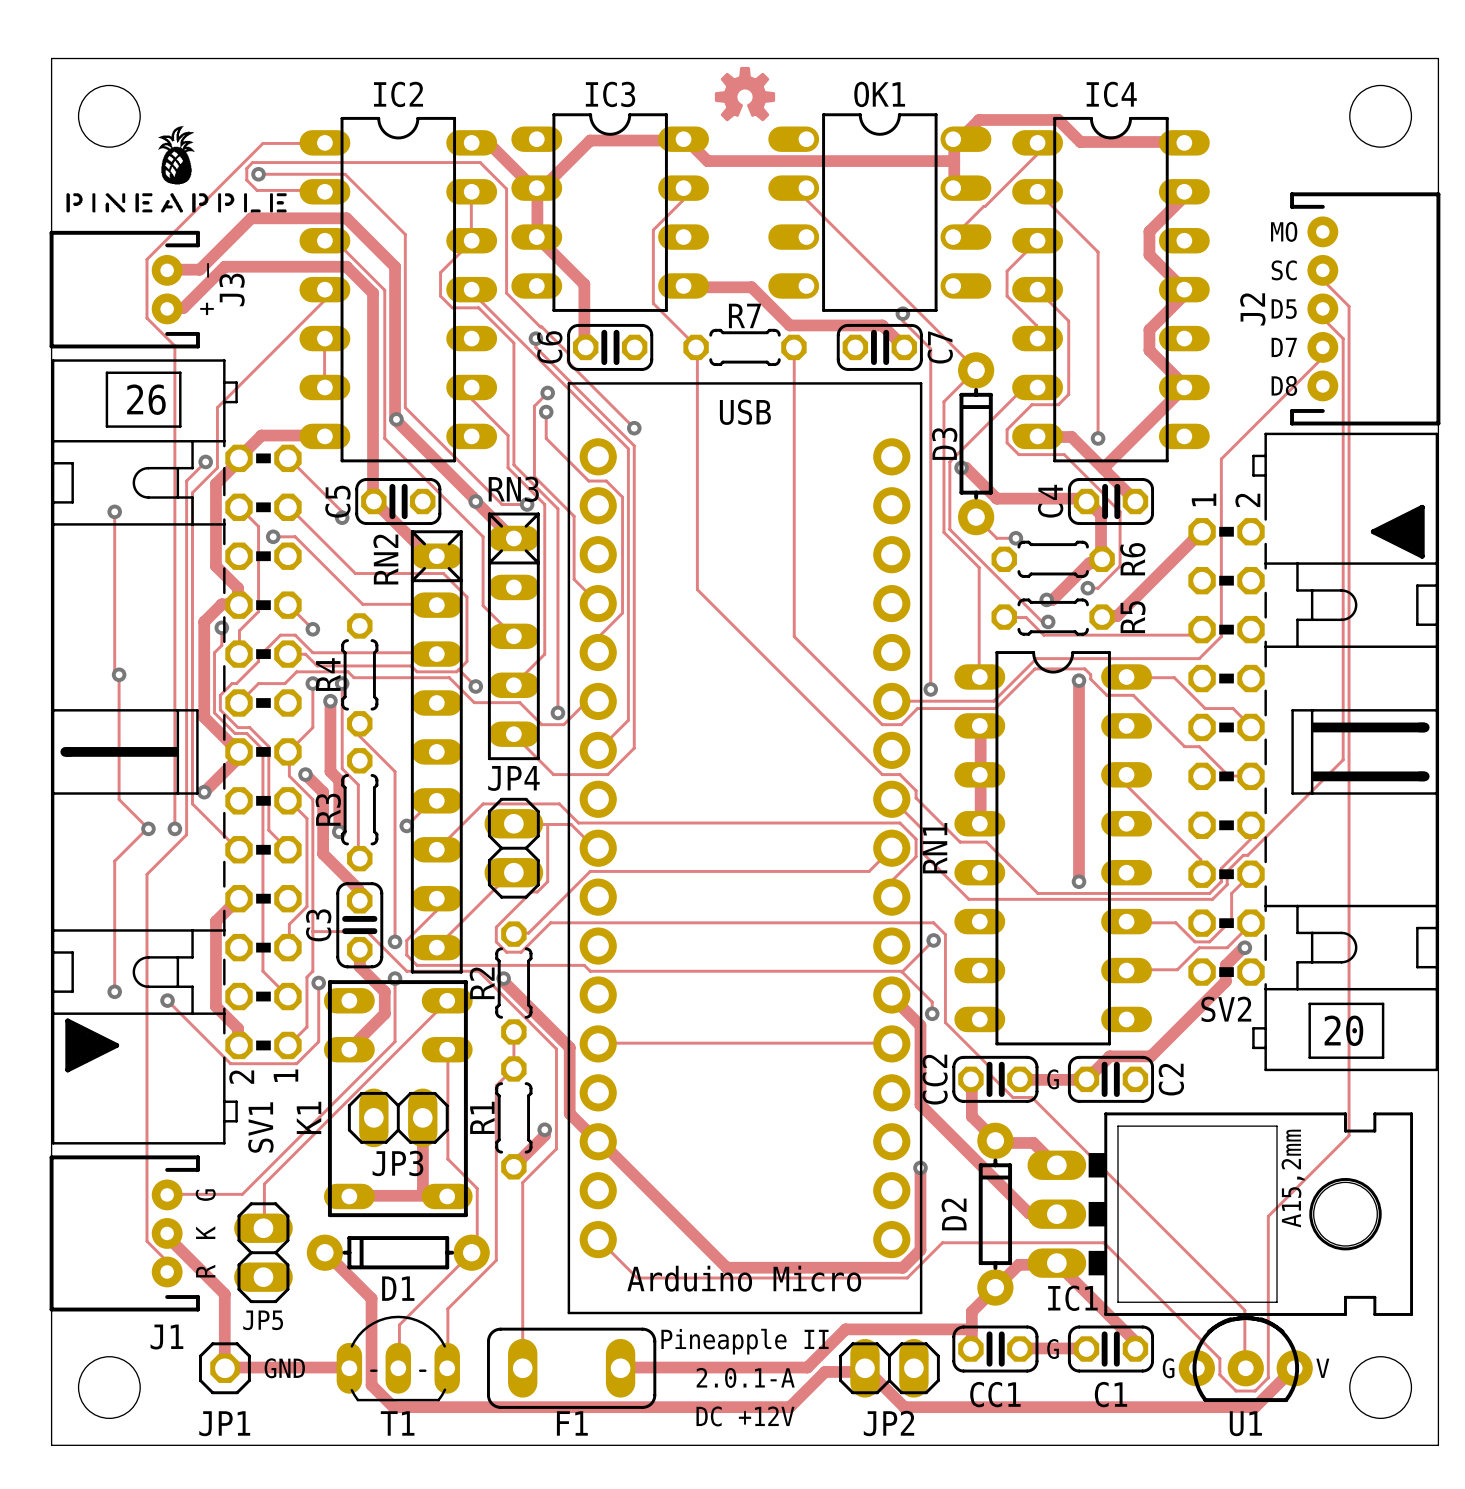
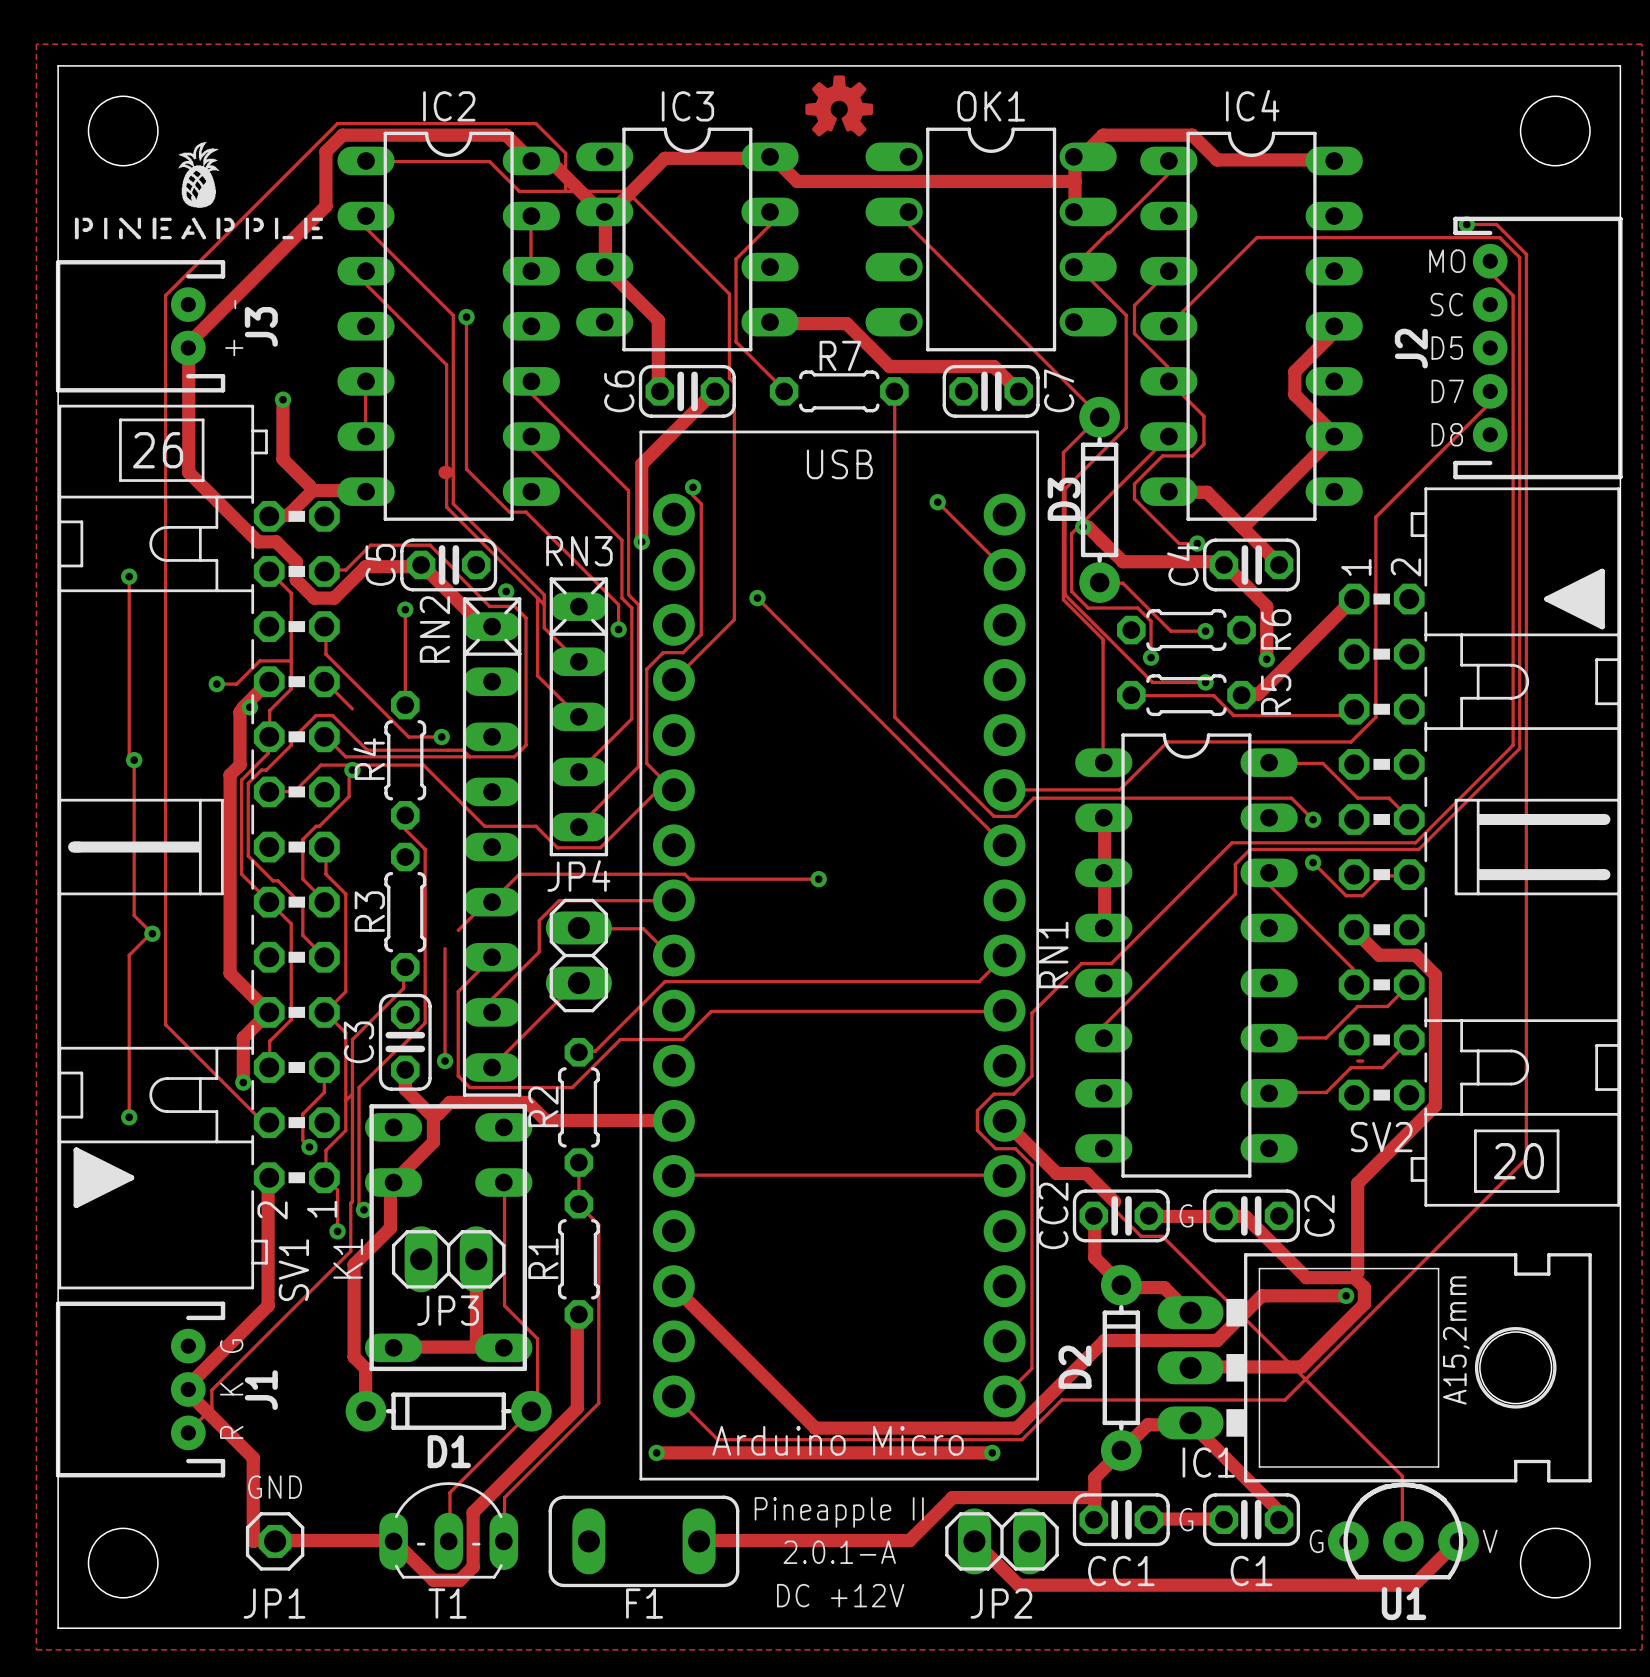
zone outline: none -> (36, 44) (1642, 44) (1642, 1649) (36, 1649) (36, 44)
track: (324, 142) (262, 143) (146, 259) (146, 262) -> (565, 191) (565, 153) (535, 123) (337, 123) (165, 295)
track: (258, 174) (345, 174) (405, 234) (405, 407) (414, 416) -> (466, 317) (466, 469)
via: (258, 174) -> none
track: (324, 191) (257, 190) (246, 180) (246, 168) (252, 162) (480, 162) (506, 188) (506, 293) (568, 353) (568, 362) (634, 428) -> (366, 216) (367, 229) (453, 315) (453, 503) (544, 594) (544, 604)
track: (1037, 191) (1098, 252) (1098, 438) -> none
track: (1184, 191) (1183, 197) (1149, 231) (1149, 255) (1184, 289) -> none
track: none -> (1466, 224) (1496, 224) (1526, 254) (1526, 1158) (1284, 1400) (1243, 1400)
via: none -> (1466, 224)
track: none -> (1073, 267) (1076, 265) (1126, 315) (1126, 427) (1065, 488) (1065, 594) (1152, 682) (1205, 682)
track: (471, 240) (440, 272) (440, 296) (452, 307) (478, 307) (513, 343) (513, 464) (557, 508) -> (531, 381) (532, 394) (628, 490) (628, 573)
track: (326, 241) (336, 241) (384, 290) (384, 438) (396, 450) -> (367, 272) (367, 285) (446, 364) (446, 507)
track: (167, 270) (199, 269) (251, 218) (346, 218) (395, 266) (395, 419) (513, 538) -> none
track: (1322, 270) (1324, 281) (1349, 306) -> (1168, 326) (1256, 237) (1499, 237) (1519, 257) (1519, 345)
via: none -> (466, 317)
track: (324, 289) (324, 300) (217, 407) (217, 467) (192, 492) (192, 803) (239, 849) -> none
track: (471, 289) (472, 293) (628, 448) (628, 720) (598, 750) -> none
track: (1037, 289) (1068, 321) (1068, 369) -> (1169, 381) (1203, 416)
track: (167, 308) (183, 307) (224, 266) (346, 266) (373, 293) (373, 501) -> (531, 160) (506, 135) (342, 135) (325, 151) (325, 206) (190, 341) (188, 347) (188, 472) (258, 541) (276, 541) (296, 561) (296, 579) (314, 598) (334, 598) (365, 566) (415, 566) (421, 564)
track: (1322, 308) (1324, 319) (1343, 338) -> (1490, 261) (1491, 274) (1513, 295) (1513, 381)
track: (902, 313) (902, 321) (930, 348) (930, 689) -> none
via: (902, 313) -> none
track: (146, 318) (174, 346) (174, 828) -> (165, 358) (165, 985)
track: (535, 338) (535, 347) (634, 445) (634, 748) (607, 774) (553, 774) (513, 734) -> none
via: (535, 338) -> none
track: none -> (714, 391) (641, 464) (641, 541)
track: (696, 347) (697, 589) (882, 774) (899, 774) (916, 790) (916, 798) (960, 842) (986, 842) (1037, 893) (1205, 893) -> none
via: none -> (282, 399)
track: (1036, 388) (1023, 388) (949, 461) (949, 529) (1042, 621) (1048, 621) -> (1167, 437) (1071, 533) (1071, 591) (1088, 608) (1137, 608) (1151, 621) (1151, 657)
track: (547, 392) (534, 406) (534, 476) (574, 516) (574, 579) (598, 603) -> (366, 160) (489, 161) (519, 191) (626, 191) (729, 293) (729, 378) (734, 383) (734, 619) (673, 679)
via: (547, 392) -> none
track: (546, 412) (546, 438) (588, 481) (606, 481) (622, 497) -> (693, 487) (693, 495) (701, 503) (701, 560)
via: (546, 412) -> none
via: (396, 419) -> none
via position: (634, 428) -> (693, 487)
track: (277, 435) (261, 435) (239, 457) -> (282, 399) (282, 459) (312, 490) (287, 515) (269, 515)
track: (508, 435) (508, 467) (544, 504) (544, 654) -> (572, 490) (621, 540) (621, 598) (631, 608) (631, 718) (613, 736)
via: (1098, 438) -> none
track: none -> (937, 502) (1004, 569)
via: none -> (937, 502)
track: (452, 454) (502, 504) (527, 504) -> (509, 512) (526, 512) (618, 604) (618, 629)
track: (1018, 454) (1064, 454) (1120, 511) (1120, 566) (1098, 588) (1087, 588) -> (1147, 512) (1179, 543) (1197, 543)
track: (239, 458) (236, 463) (215, 483) (215, 566) (237, 588) (239, 605) (221, 604) (204, 621) (204, 687) -> (269, 681) (239, 712) (239, 765) (230, 775)
track: (287, 458) (342, 511) (342, 517) -> none
track: (205, 461) (186, 481) (186, 834) (146, 874) -> none
via: (205, 461) -> none
via: none -> (641, 541)
via: none -> (1197, 543)
via position: (475, 501) -> (506, 591)
via: (527, 504) -> none
track: (287, 507) (355, 573) (443, 573) (466, 596) -> (324, 571) (345, 570) (370, 545) (430, 545) (489, 606) (514, 606) (526, 617) (526, 672)
track: (1101, 514) (1102, 559) (1096, 563) (1089, 563) (1052, 599) (1046, 599) -> (1240, 579) (1266, 606) (1266, 659)
via position: (342, 517) -> (405, 609)
track: (976, 517) (996, 538) (1015, 538) -> (1099, 583) (1122, 583) (1170, 631) (1205, 631)
track: (557, 528) (557, 712) -> (628, 594) (638, 604) (638, 766) (578, 827)
track: none -> (757, 598) (1004, 845)
via: none -> (757, 598)
track: (273, 536) (295, 536) (362, 604) (436, 605) -> none
via: (273, 536) -> none
via: (1015, 538) -> none
track: none -> (405, 609) (405, 705)
track: none -> (324, 626) (325, 627) (325, 654) (408, 736) (441, 736)
track: (483, 557) (483, 605) -> (537, 598) (537, 675) (544, 682)
track: none -> (544, 627) (578, 661)
via: none -> (618, 629)
via: none -> (1205, 631)
track: (622, 563) (622, 613) (599, 636) (598, 652) -> none
via: none -> (1151, 657)
via: none -> (1266, 659)
track: none -> (291, 660) (259, 660) (236, 684) (216, 684)
via: (1087, 588) -> none
via: (1046, 599) -> none
via: none -> (1205, 682)
via: none -> (216, 684)
track: (1026, 617) (1043, 635) (1095, 635) -> (1155, 695) (1213, 695) (1233, 715)
via: (1048, 621) -> none
track: (221, 627) (221, 645) (214, 652) (214, 692) -> (269, 736) (268, 753) (241, 779)
via: (312, 629) -> none
track: (312, 652) (436, 654) -> (352, 735) (367, 750)
track: (289, 654) (305, 654) (317, 665) (326, 665) -> (325, 736) (345, 756)
via: none -> (441, 736)
track: (1343, 661) (1343, 759) (1247, 855) (1243, 855) (1227, 871) (1227, 884) (1212, 899) (968, 899) (921, 852) (921, 828) (891, 799) -> (1513, 745) (1415, 842) (1232, 842) (1111, 963) (1081, 963) (1031, 1013) (1031, 1075) (1013, 1094)
track: (1349, 664) (1349, 1135) (1268, 1216) (1268, 1377) (1255, 1391) (1236, 1391) (1219, 1374) (1219, 1358) (1103, 1242) -> (1519, 748) (1418, 849) (1250, 849) (1235, 864) (1235, 894) (1104, 1024) (1103, 1038)
track: (458, 669) (475, 686) -> none
track: (306, 671) (296, 671) (284, 683) (258, 683) (239, 702) -> (701, 634) (683, 652) (663, 652) (646, 669) (646, 763) (673, 790) (664, 783) (600, 847) (557, 847) (535, 826) (484, 826) (423, 765) (321, 765) (294, 791) (269, 791)
track: (348, 671) (353, 677) (449, 677) (474, 702) (519, 702) (541, 724) (563, 724) (585, 702) (598, 701) -> (392, 756) (469, 756)
track: (1078, 680) (1078, 881) -> none
via: (1078, 680) -> none
track: (312, 683) (312, 727) (287, 751) -> none
track: (342, 683) (342, 768) (358, 784) (359, 858) -> none
via: (342, 683) -> none
via: (475, 686) -> none
via: (930, 689) -> none
track: none -> (349, 778) (349, 796) (319, 826) (316, 826) (302, 841)
track: (330, 701) (330, 771) (339, 780) (339, 831) -> none
via: (330, 701) -> none
track: (995, 708) (1034, 668) (1084, 668) (1090, 674) (1090, 679) (1106, 695) (1133, 695) (1146, 708) -> (1121, 798) (1291, 798)
track: (220, 710) (237, 727) (249, 727) (268, 746) -> (248, 799) (248, 856) (273, 880) (278, 880) (302, 905)
track: (214, 712) (235, 733) (246, 733) (262, 749) (262, 971) (287, 996) -> (241, 803) (241, 874) (291, 923) (291, 1019) (269, 1041) (269, 1067)
via: (557, 712) -> none
track: (204, 717) (239, 751) (236, 759) (204, 792) -> (230, 808) (230, 973) (269, 1012)
track: (1165, 727) (1184, 746) (1199, 746) (1228, 776) (1251, 776) -> (1313, 862) (1346, 895) (1362, 895) (1382, 875) (1409, 874)
via: none -> (1313, 819)
track: (377, 754) (395, 771) (395, 842) -> (425, 849) (425, 1023) (398, 1049)
via: none -> (1313, 862)
track: (305, 774) (323, 792) (323, 853) (358, 889) (359, 900) -> none
via: (305, 774) -> none
track: (268, 780) (268, 803) -> (302, 879) (324, 902)
track: none -> (818, 879) (689, 879) (684, 874) (519, 874) (492, 902)
via: none -> (818, 879)
via: (204, 792) -> none
track: (306, 793) (312, 799) (312, 922) -> (405, 967) (403, 968) (403, 988) (352, 1039)
track: (119, 799) (148, 828) (114, 861) -> (134, 900) (134, 915) (152, 933) (129, 955) (129, 970)
track: none -> (673, 900) (559, 900) (539, 920) (539, 951) (492, 998) (492, 1012)
track: (287, 800) (306, 818) -> (345, 894) (345, 922)
track: (547, 824) (547, 881) (537, 891) (531, 891) (496, 927) (496, 941) (506, 952) (521, 952) -> (572, 1087) (587, 1072)
via: (406, 825) -> none
track: none -> (1354, 929) (1379, 955) (1415, 955) (1435, 975) (1435, 1105) (1357, 1183) (1357, 1272) (1354, 1277)
track: (1251, 825) (1250, 839) (1221, 868) (1221, 881) (1209, 893) -> none
via position: (148, 828) -> (152, 933)
via: (174, 828) -> none
via: (339, 831) -> none
track: (436, 849) (483, 803) (559, 803) (578, 823) (899, 823) (916, 839) (916, 856) (892, 880) (891, 897) -> none
track: (306, 880) (306, 906) (289, 924) (287, 947) -> (345, 991) (324, 1012) (345, 1032) (345, 1100)
via: (1078, 881) -> none
track: (1231, 893) (1231, 919) (1209, 941) -> (1387, 1006) (1362, 1006)
track: (436, 898) (436, 911) (406, 940) -> (492, 957) (458, 991) (458, 1059)
track: (146, 909) (146, 1241) (166, 1260) (167, 1271) -> (352, 1094) (350, 1251) (211, 1390) (211, 1408) (188, 1432)
track: none -> (165, 1024) (263, 1122) (269, 1122)
track: (1126, 921) (1175, 922) (1194, 941) (1205, 941) -> (1269, 1038) (1326, 1037) (1357, 1006)
track: (606, 922) (933, 922) (945, 934) (945, 1022) (964, 1041) -> (683, 1039) (711, 1011) (1004, 1010)
track: (312, 931) (352, 931) -> (359, 1107) (359, 1087) (397, 1049)
track: (353, 931) (367, 931) (406, 971) (478, 971) (556, 1049) (556, 1148) (522, 1182) (522, 1368) -> none
track: (933, 940) (902, 971) -> none
via: (933, 940) -> none
track: none -> (324, 1067) (324, 1092) (302, 1113) (302, 1140) (309, 1147)
track: (1244, 947) (1225, 965) (1225, 981) (1150, 1056) (1109, 1056) (1086, 1079) -> (1354, 1277) (1306, 1277) (1245, 1216) (1223, 1215)
via: (1244, 947) -> none
track: (215, 960) (215, 1006) (237, 1028) (239, 1045) -> (188, 1389) (188, 1385) (268, 1305) (269, 1177)
via: none -> (243, 1082)
track: (508, 965) (584, 965) (590, 971) (882, 971) -> (1004, 1396) (1031, 1368) (1031, 1165) (1015, 1148) (995, 1148) (977, 1130) (977, 1110) (993, 1094)
track: (899, 971) (932, 1002) (932, 1013) -> none
track: (395, 978) (395, 1041) (346, 1090) -> (393, 1182) (390, 1188) (390, 1228)
via: (395, 978) -> none
track: (503, 978) (503, 981) (569, 1047) (569, 1113) (597, 1141) (603, 1144) (726, 1267) -> (673, 1286) (815, 1428) (818, 1428)
via: (503, 978) -> none
via: (318, 982) -> none
track: none -> (433, 1117) (449, 1102) (527, 1102) (545, 1120) (673, 1120)
track: (891, 994) (920, 1025) (920, 1104) (1029, 1213) (1056, 1214) -> (1004, 1120) (1056, 1173) (1086, 1173)
track: (167, 1000) (230, 1063) (296, 1063) (318, 1041) -> (364, 1209) (359, 1204) (359, 1173)
via: (167, 1000) -> none
track: (447, 1000) (264, 1184) (263, 1228) -> none
track: (306, 1003) (306, 1027) (289, 1044) -> (345, 1130) (325, 1150) (325, 1176)
via: (932, 1013) -> none
via: none -> (309, 1147)
track width: thin (964, 1041) (989, 1066) -> thick (1086, 1173) (1114, 1201)
track: none -> (324, 1177) (337, 1190) (337, 1231)
track: (513, 1068) (496, 1085) (496, 1260) (447, 1308) (447, 1329) -> (578, 1204) (598, 1224) (598, 1403) (504, 1497)
via: none -> (364, 1209)
track width: thin (346, 1090) (314, 1122) -> thick (390, 1228) (354, 1264)
via: none -> (337, 1231)
track: (314, 1122) (242, 1194) (167, 1194) -> (354, 1264) (354, 1357) (365, 1368) (366, 1411)
track: (544, 1129) (544, 1135) (513, 1166) -> (393, 1541) (433, 1580) (459, 1580) (473, 1567) (473, 1512) (577, 1408) (577, 1315) (578, 1314)
via: (544, 1129) -> none
track: none -> (1354, 1277) (1364, 1287) (1364, 1304) (1301, 1366) (1190, 1367)
via: none -> (1346, 1295)
track: (920, 1167) (920, 1250) -> (1346, 1295) (1261, 1295) (1217, 1340) (1104, 1340) (1036, 1408)
via: (920, 1167) -> none
JP5: (263, 1252) -> none
track: (324, 1252) (371, 1298) (371, 1385) (393, 1407) (789, 1407) (825, 1371) (860, 1371) (865, 1368) -> none
track: none -> (656, 1452) (992, 1452)
via: none -> (656, 1452)
via: none -> (992, 1452)
J1 name rotation: 0° (166, 1337) -> 90° counterclockwise (261, 1390)
J1 name position: J1 (166, 1337) -> J1 (261, 1390)
JP1 position: (224, 1368) -> (275, 1541)
text position: GND (284, 1368) -> GND (275, 1487)

